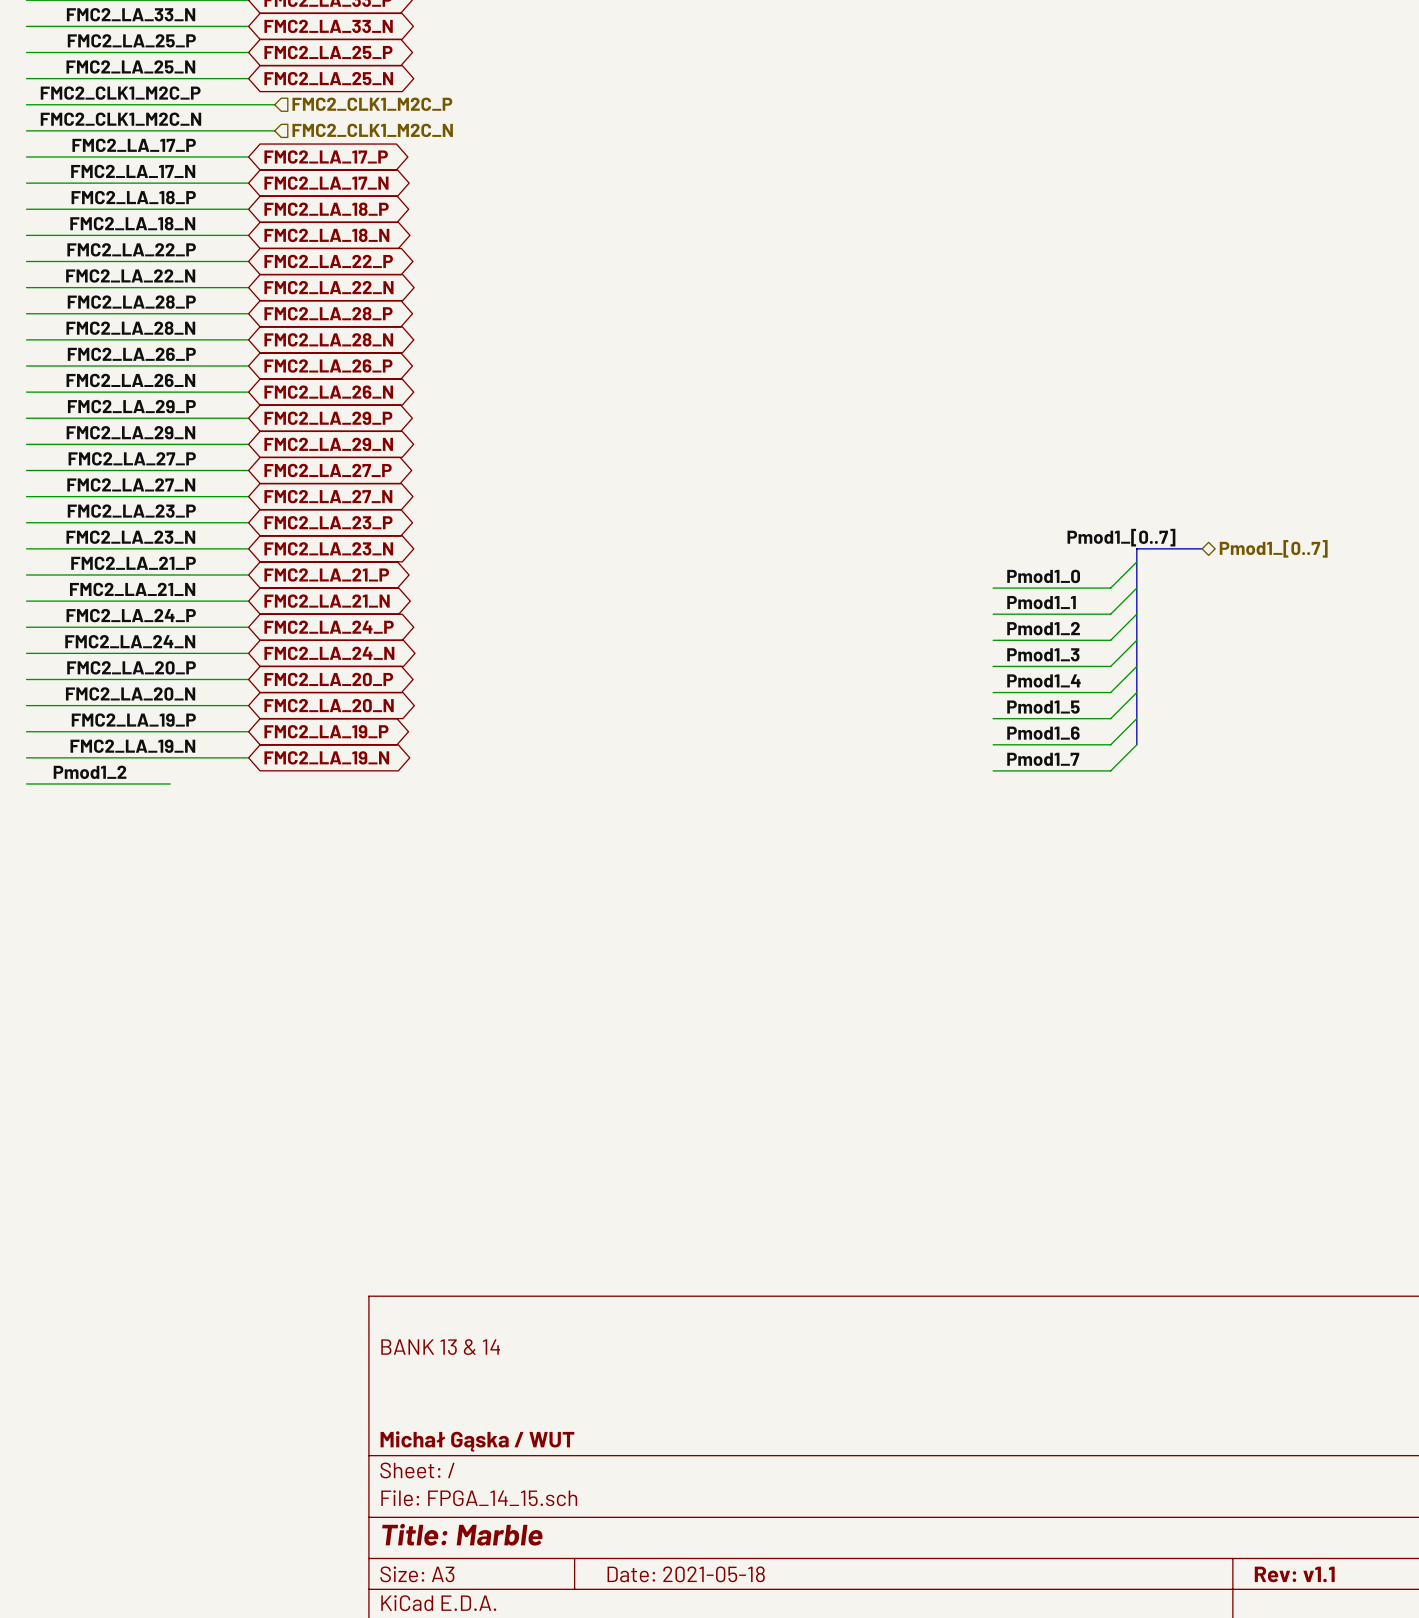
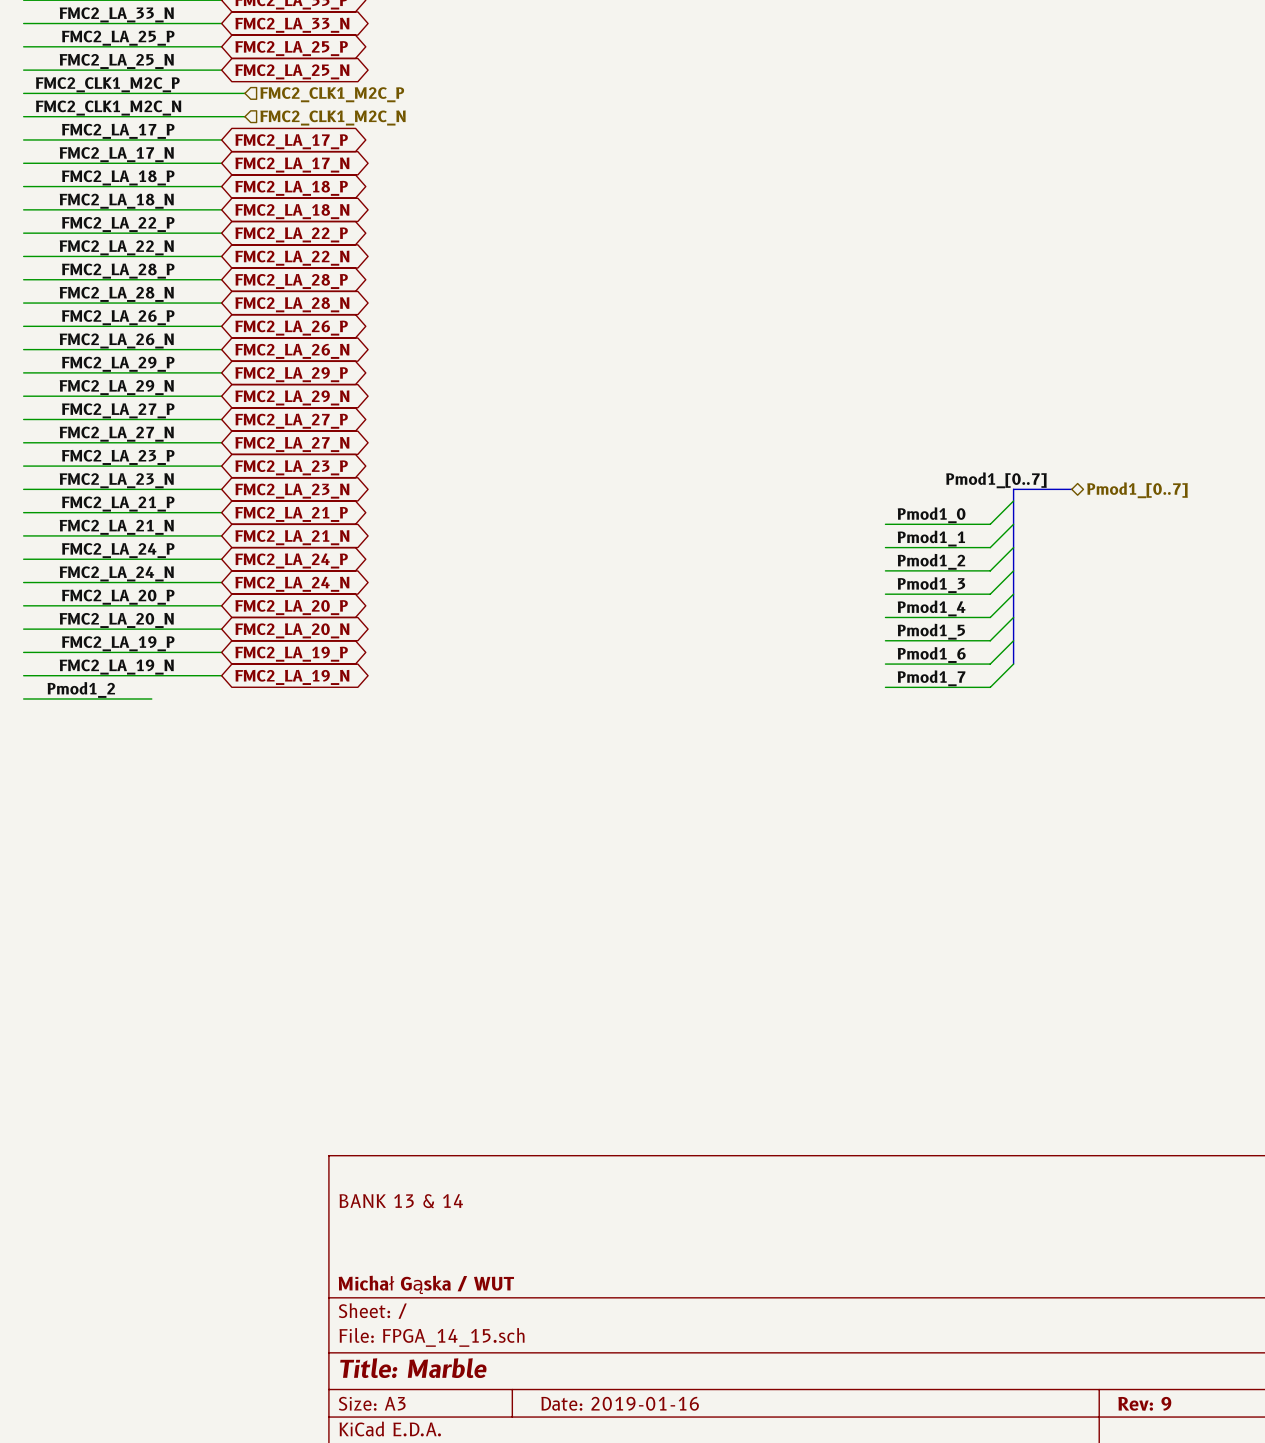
title block: Date: 2021-05-18 (686, 1574) -> Date: 2019-01-16 (620, 1403)
title block: Rev: v1.1 (1294, 1574) -> Rev: 9 (1144, 1403)

